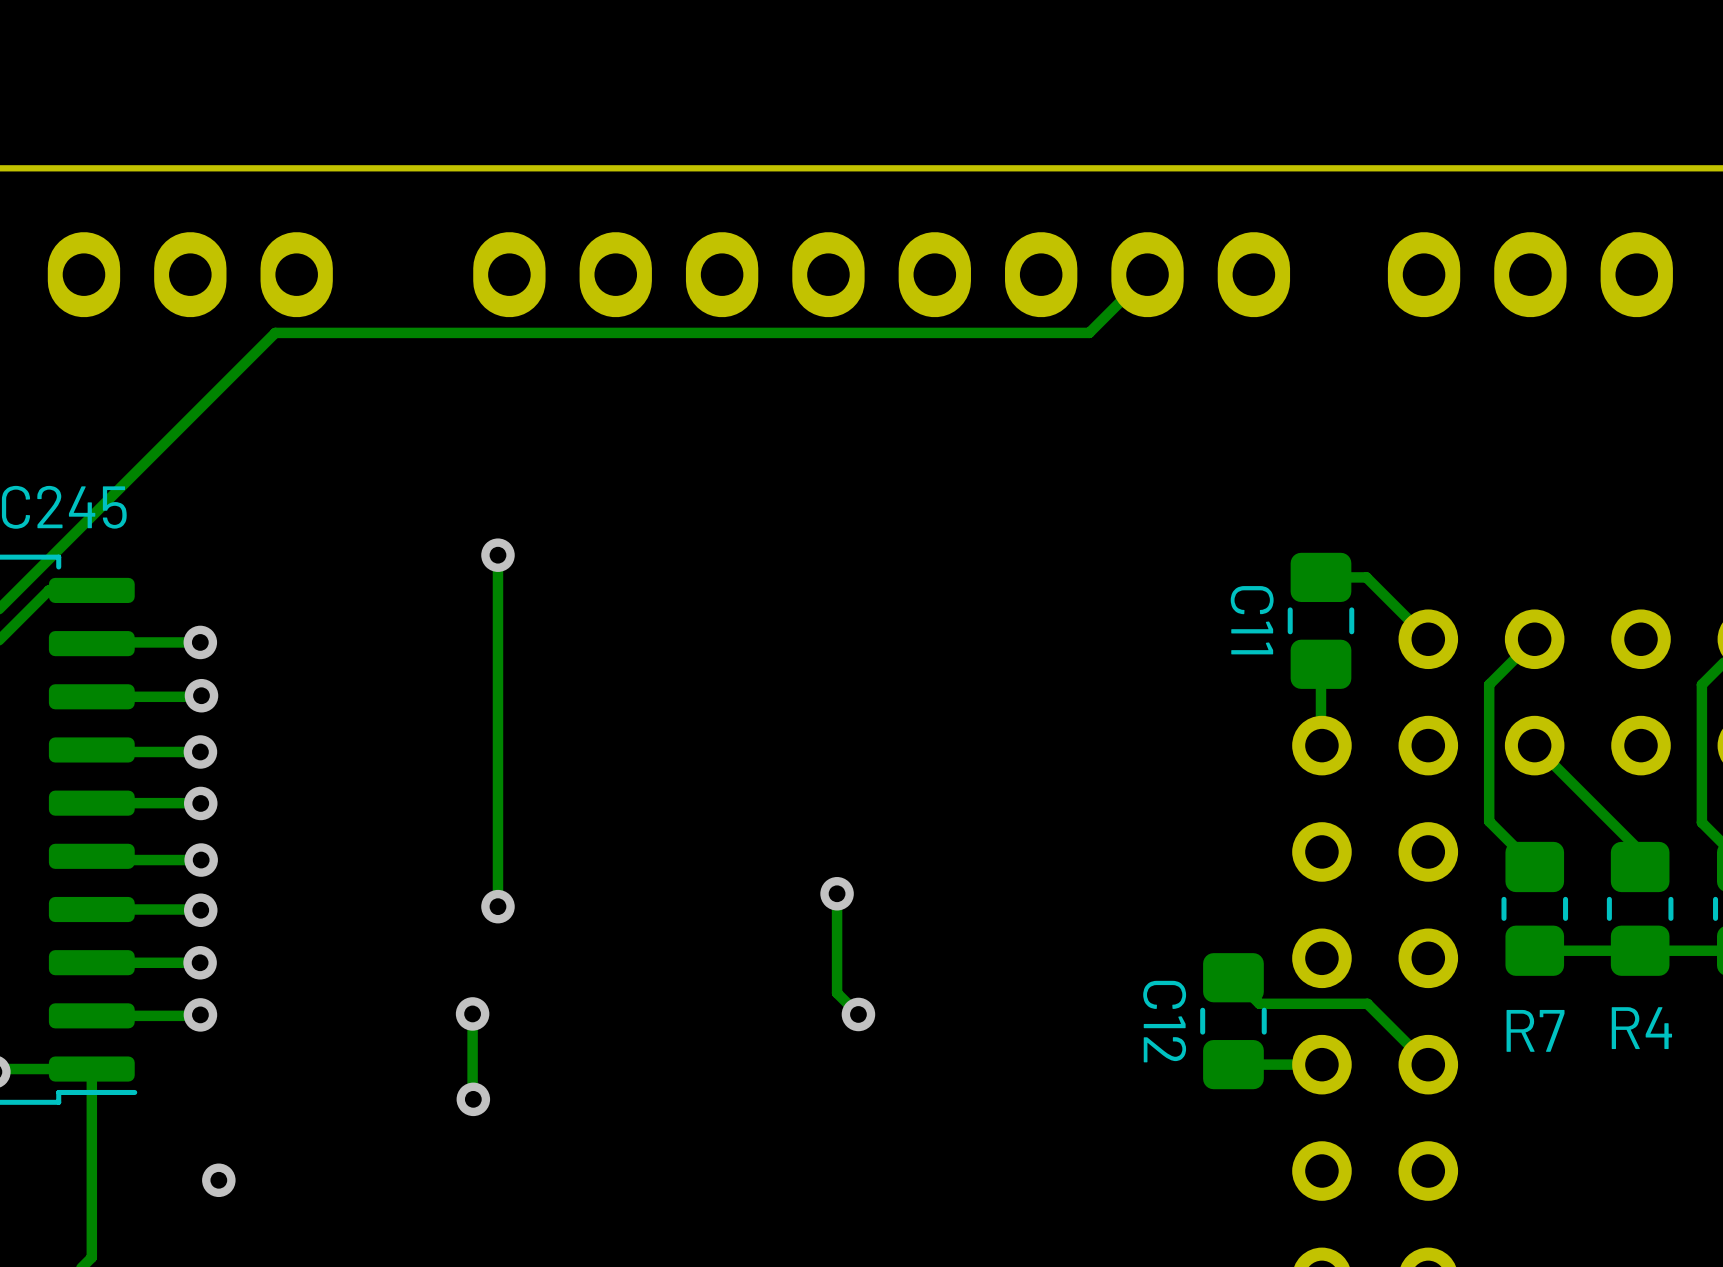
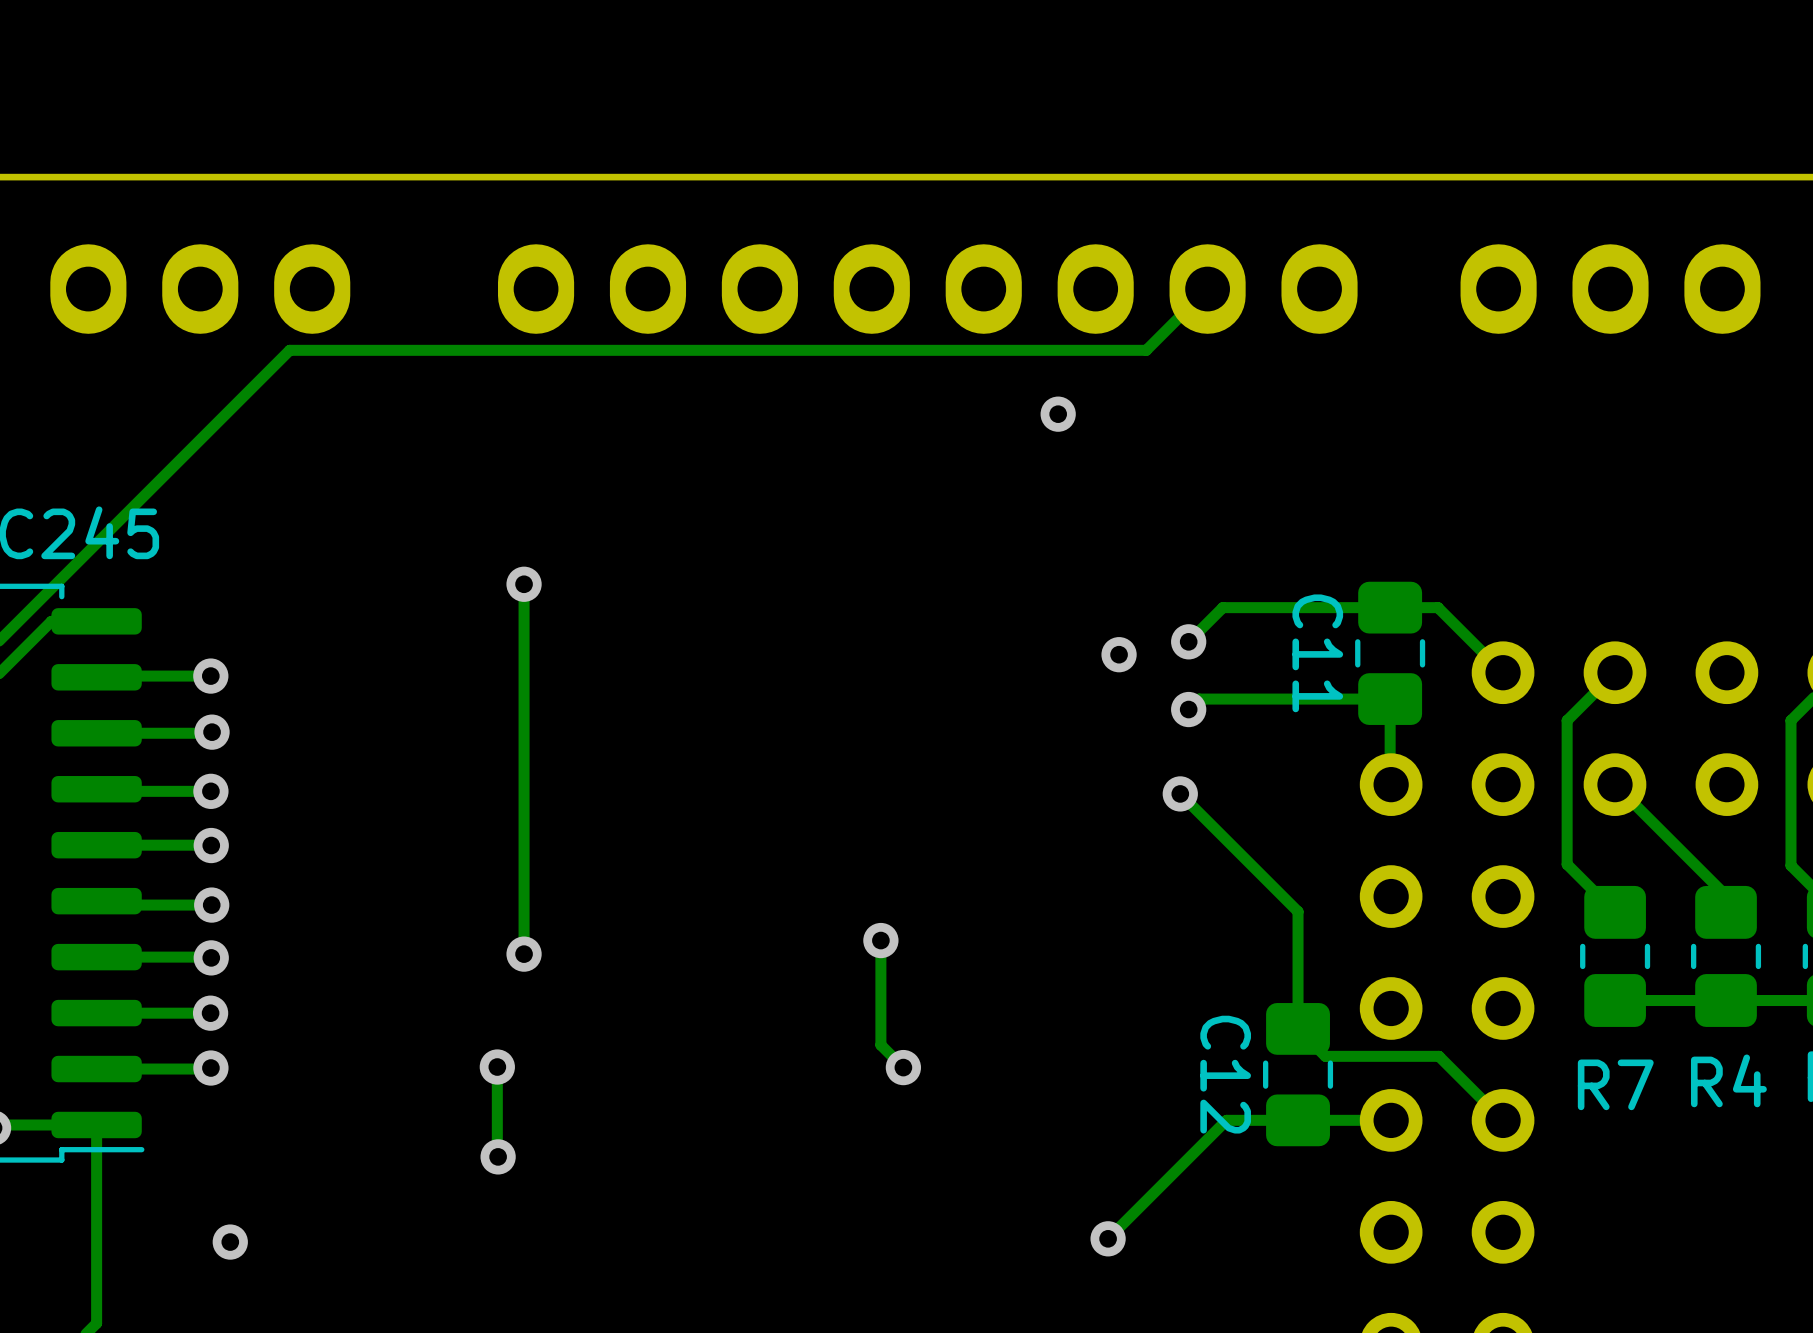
via: none -> (1058, 414)
track: none -> (1390, 607) (1222, 607) (1188, 641)
via: none -> (1188, 641)
via: none -> (1119, 654)
track: none -> (1390, 699) (1199, 699) (1188, 709)
via: none -> (1188, 709)
track: none -> (1180, 793) (1298, 911) (1298, 1028)
via: none -> (1180, 793)
track: none -> (1298, 1120) (1226, 1120) (1108, 1238)
via: none -> (1108, 1238)

